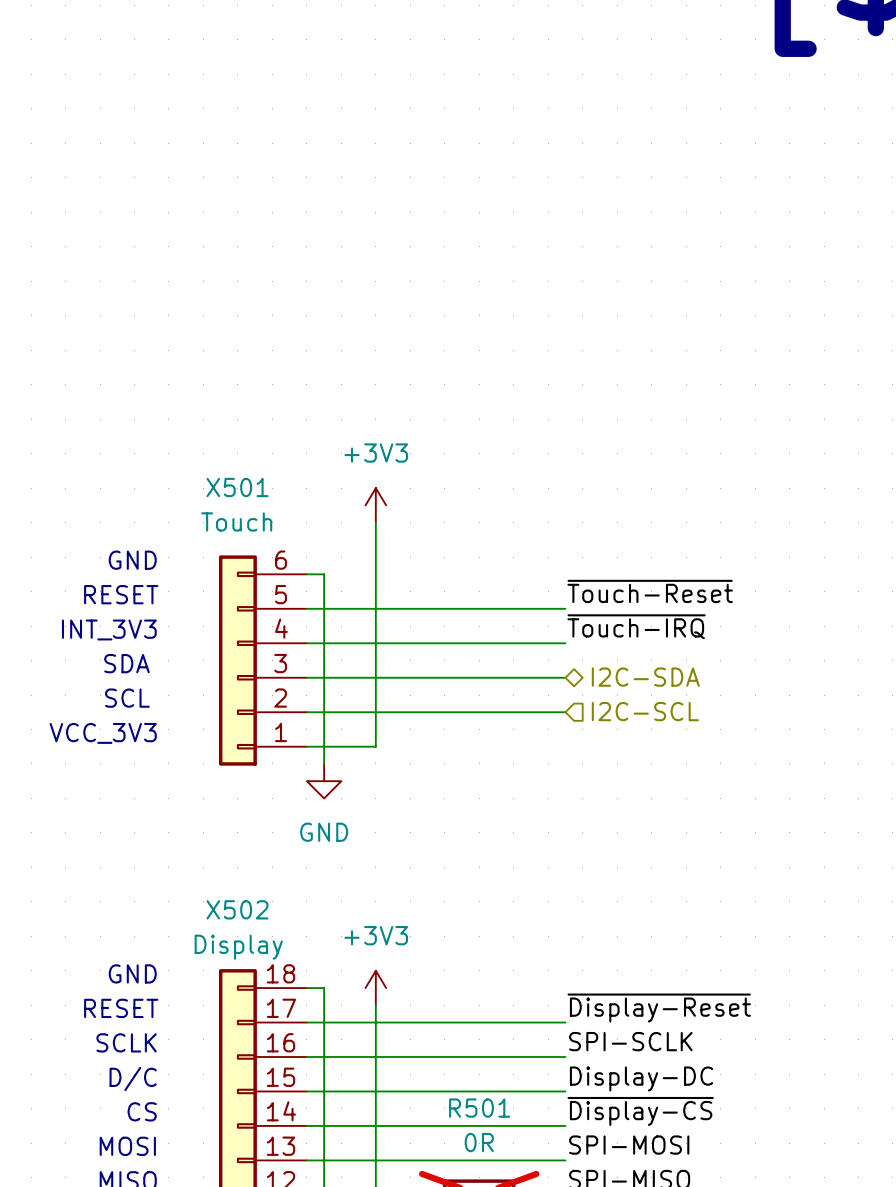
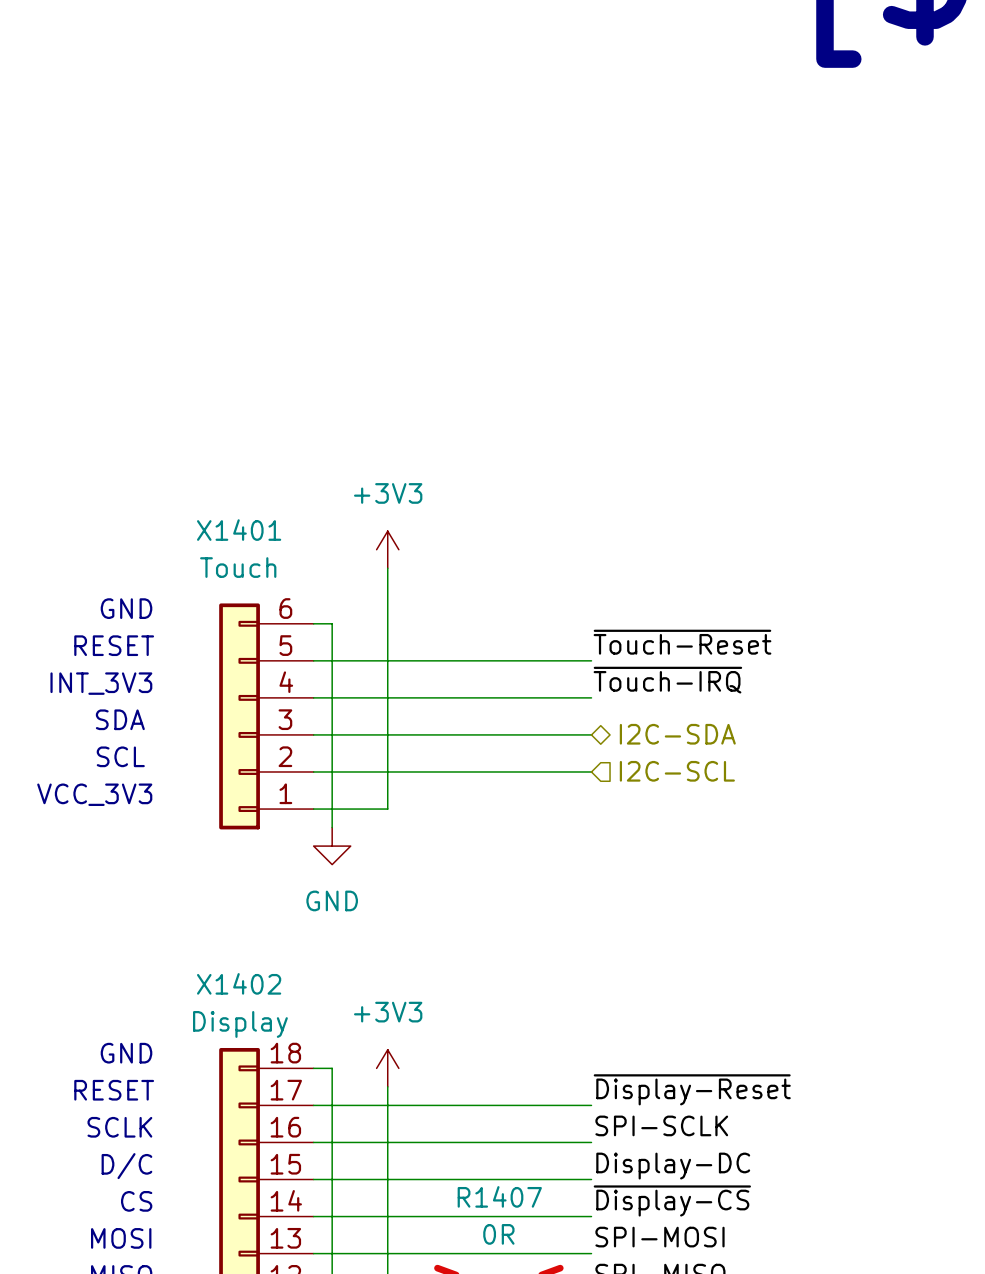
X501 name: X501 (237, 487) -> X1401 (239, 530)
X502 name: X502 (237, 909) -> X1402 (239, 983)
R501 name: R501 (479, 1108) -> R1407 (499, 1196)

